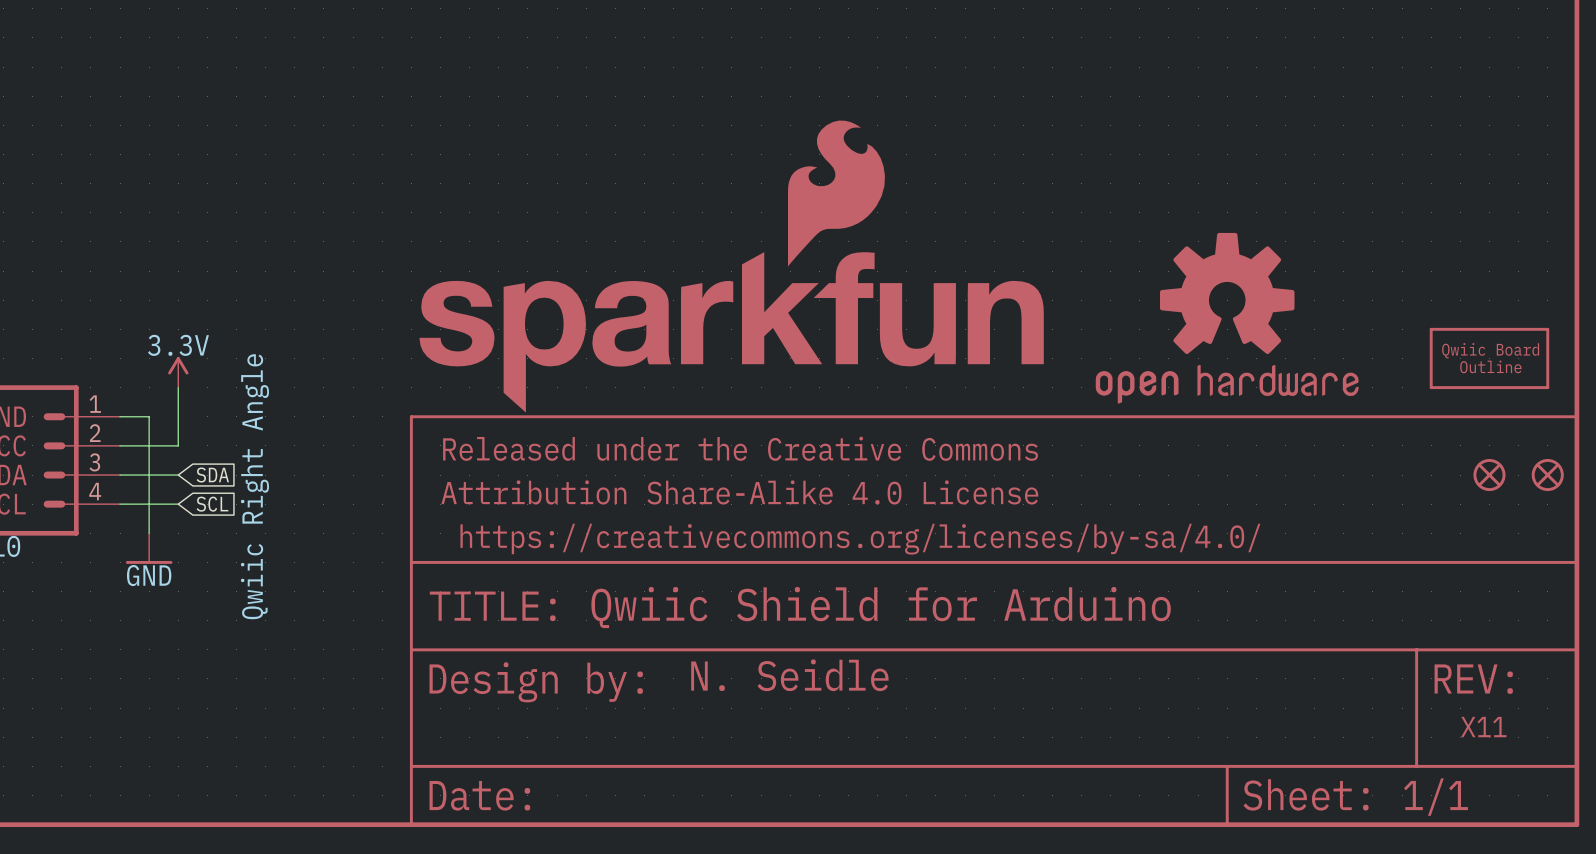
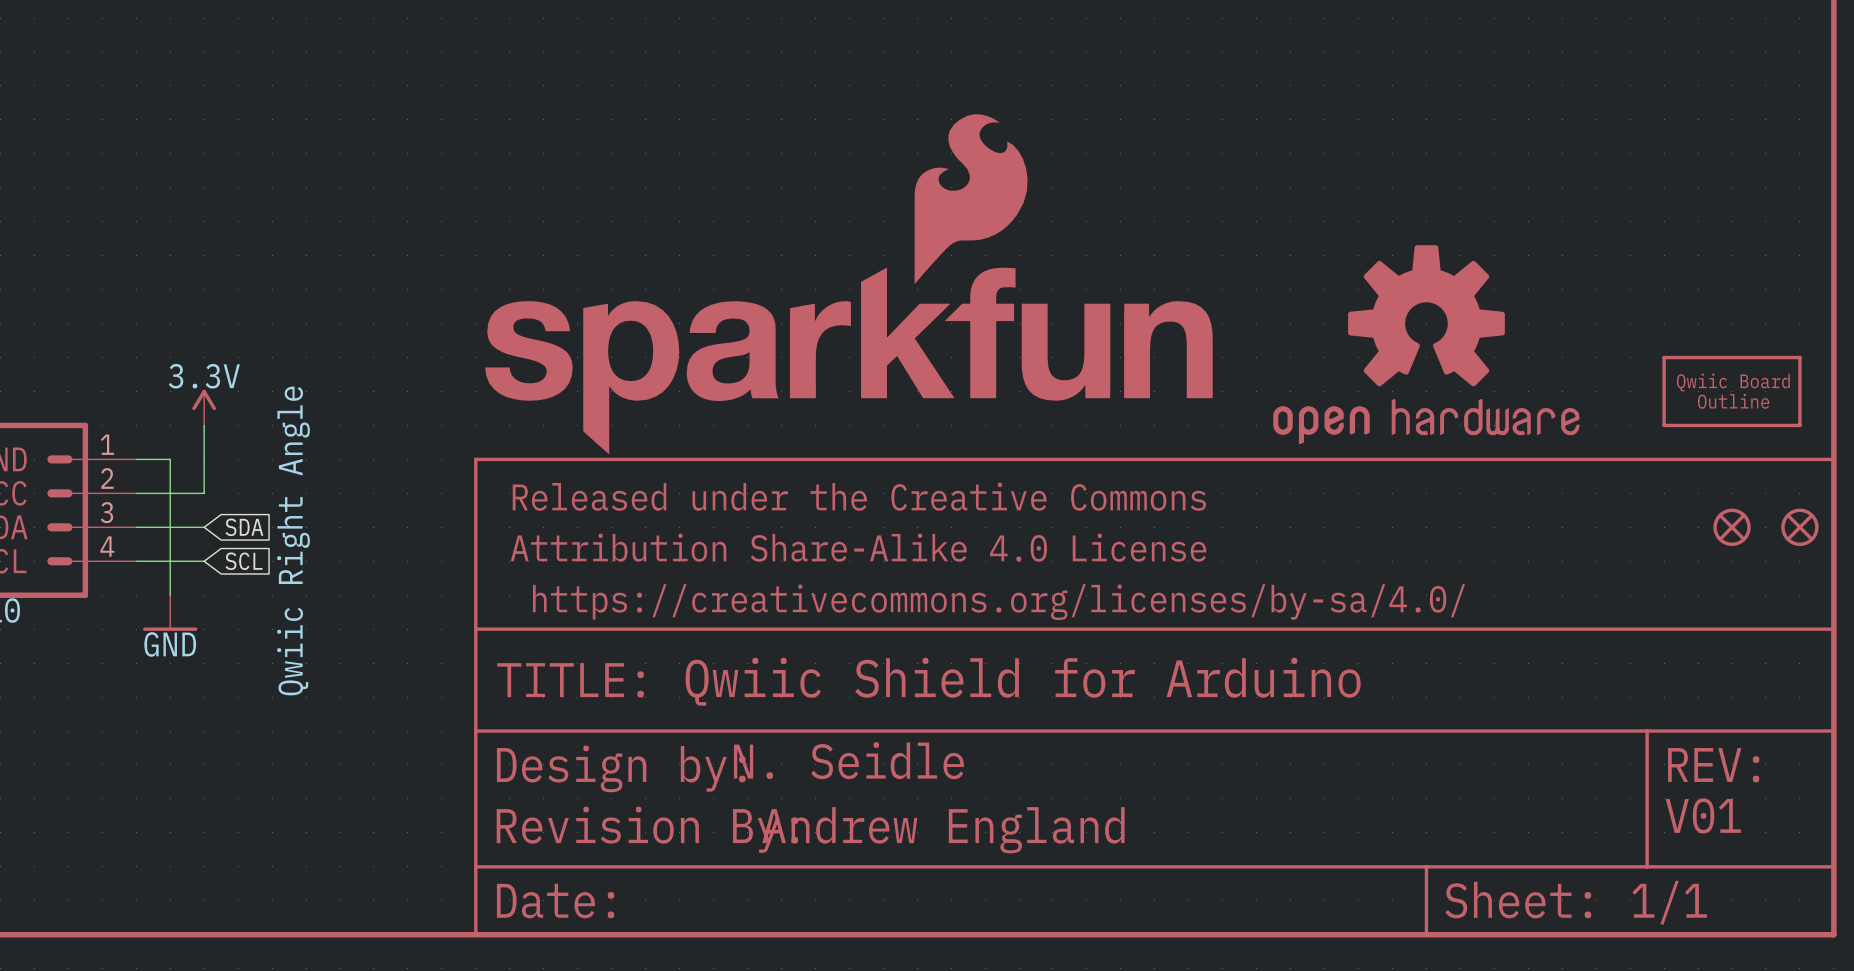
text position: N. Seidle (789, 675) -> N. Seidle (848, 760)
text: none -> V01 (1703, 815)
text: X11 (1483, 727) -> none
part: none -> (647, 829)
text: none -> Andrew England (943, 830)

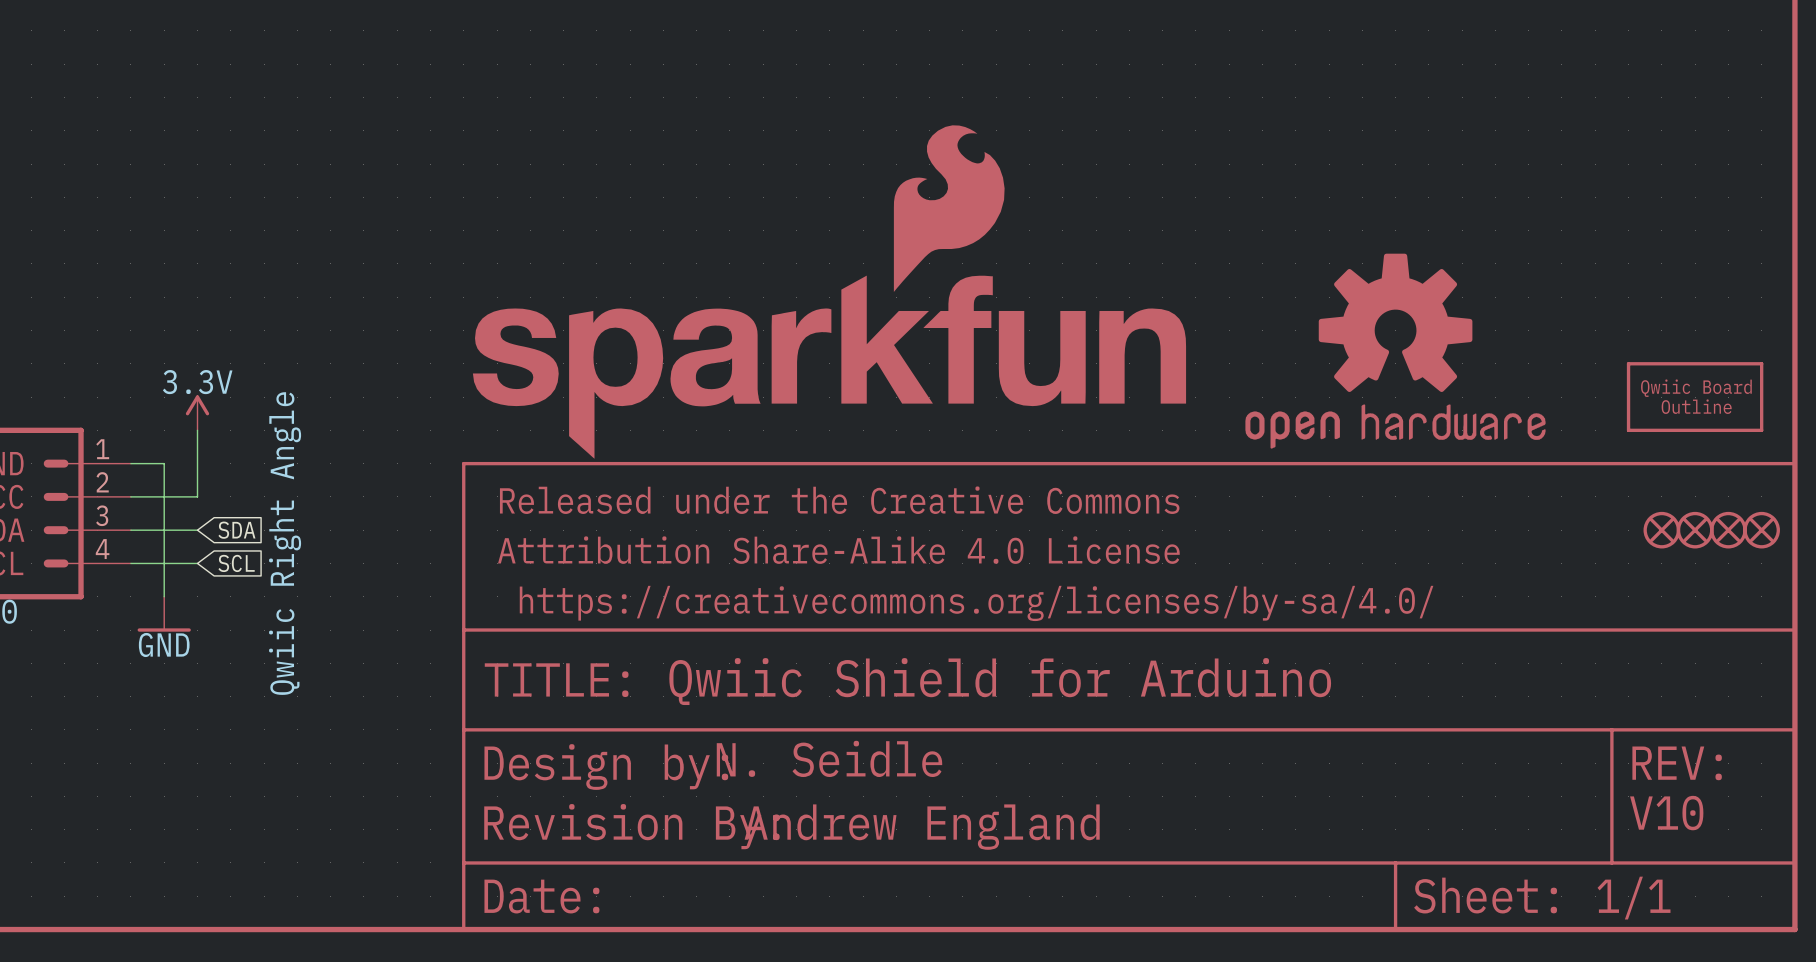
part: none -> (1661, 530)
part: none -> (1728, 530)
text: V01 (1703, 815) -> V10 (1666, 813)

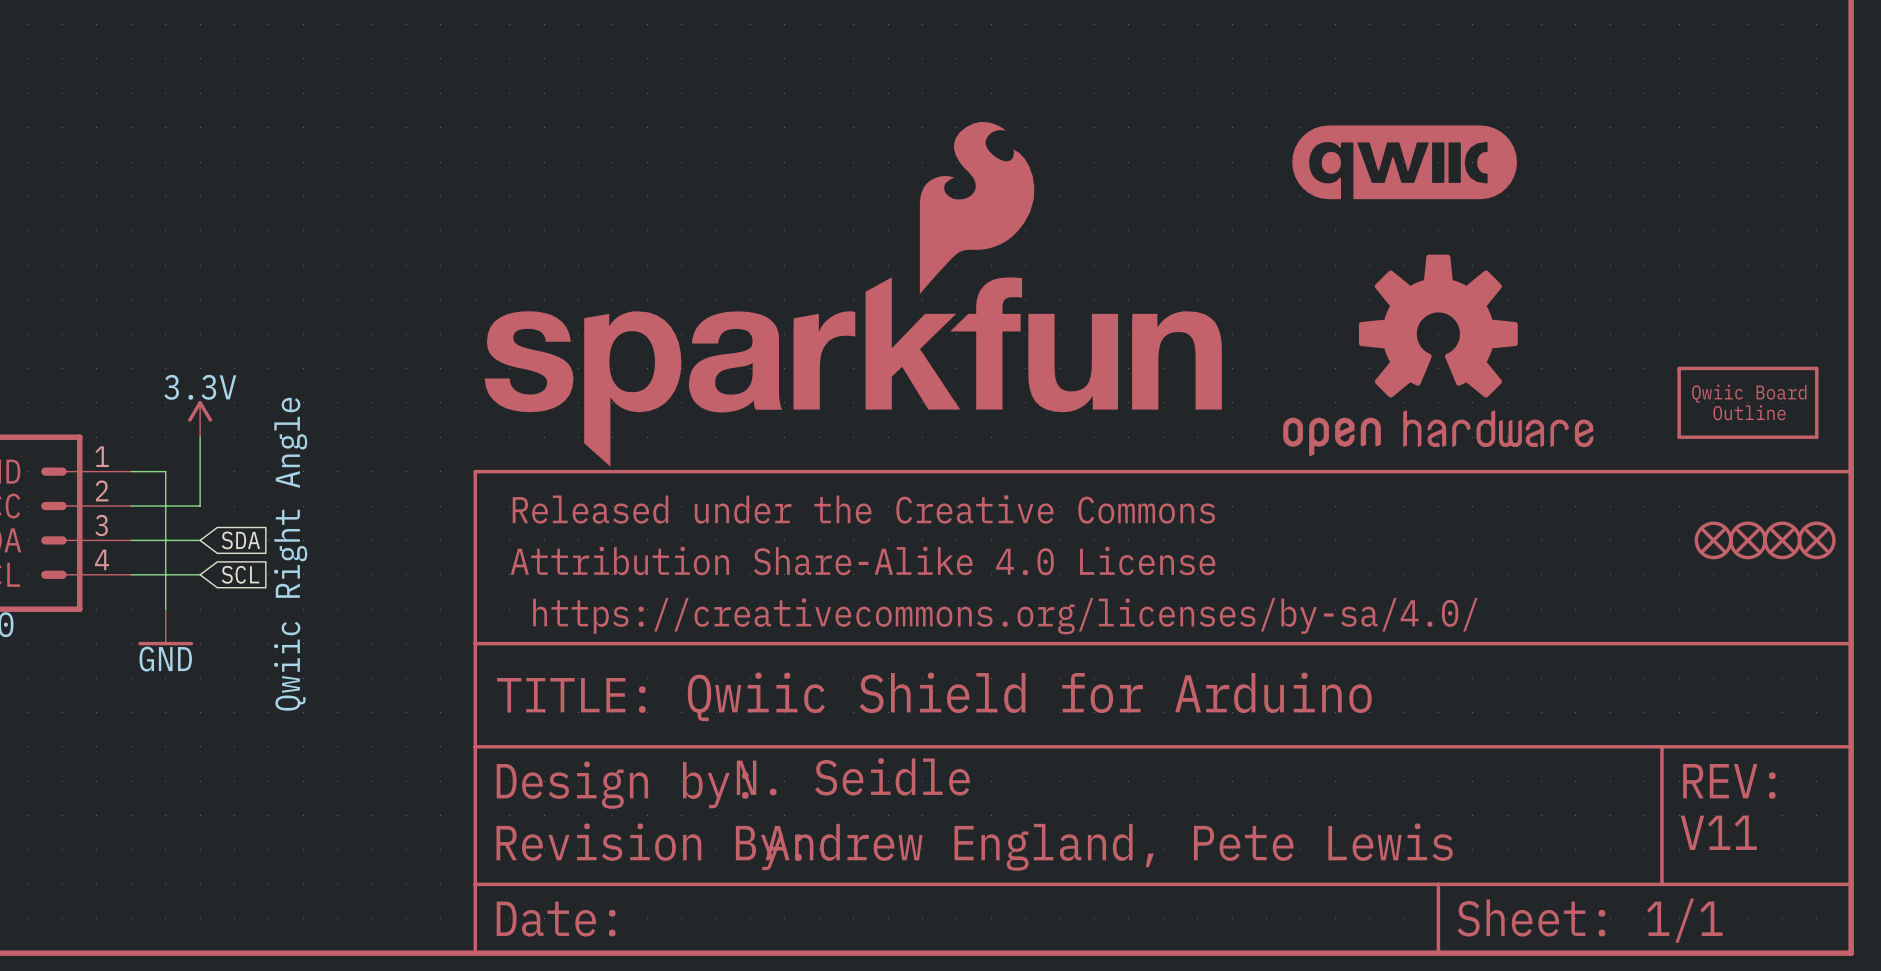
part: none -> (1404, 162)
text: V10 (1666, 813) -> V11 (1718, 832)
text: Andrew England (922, 827) -> Andrew England, Pete Lewis (1109, 847)

